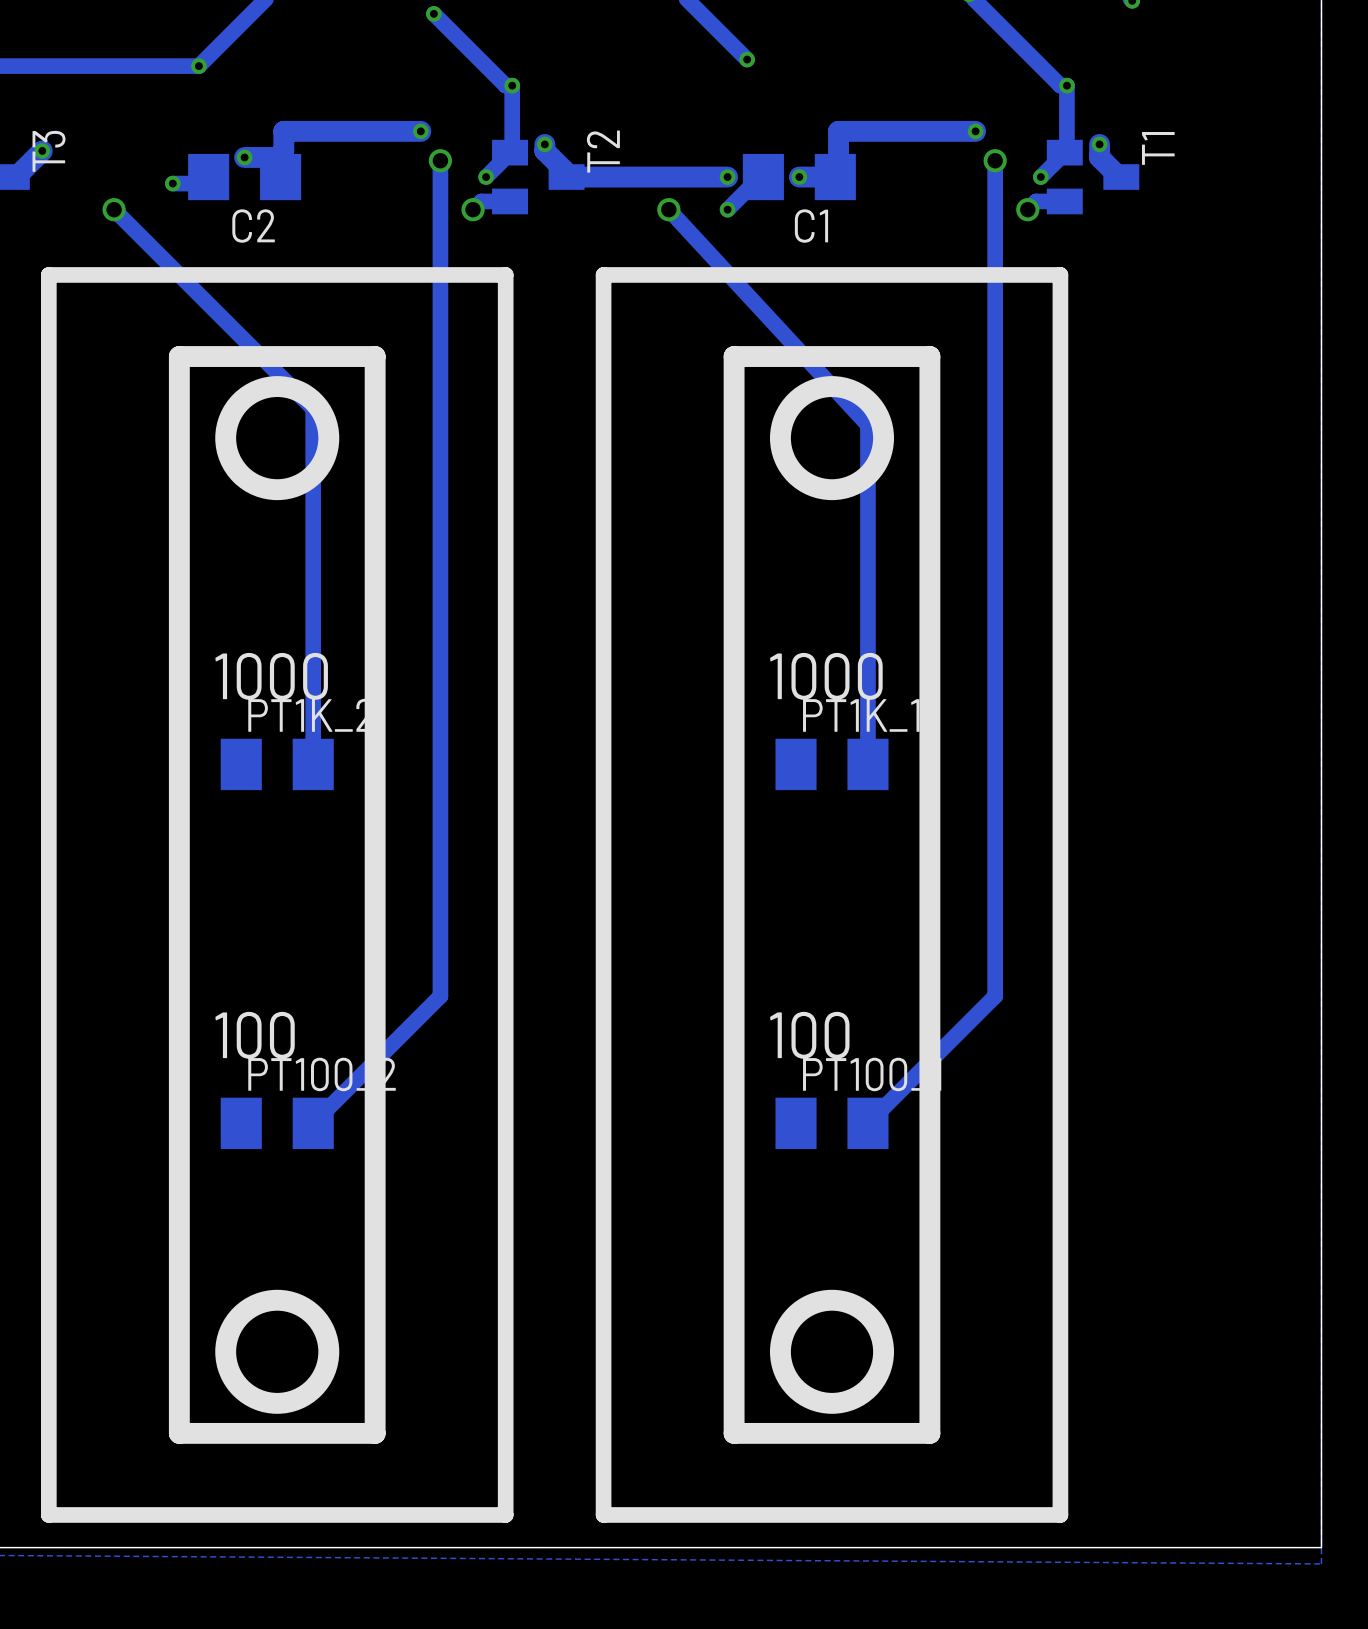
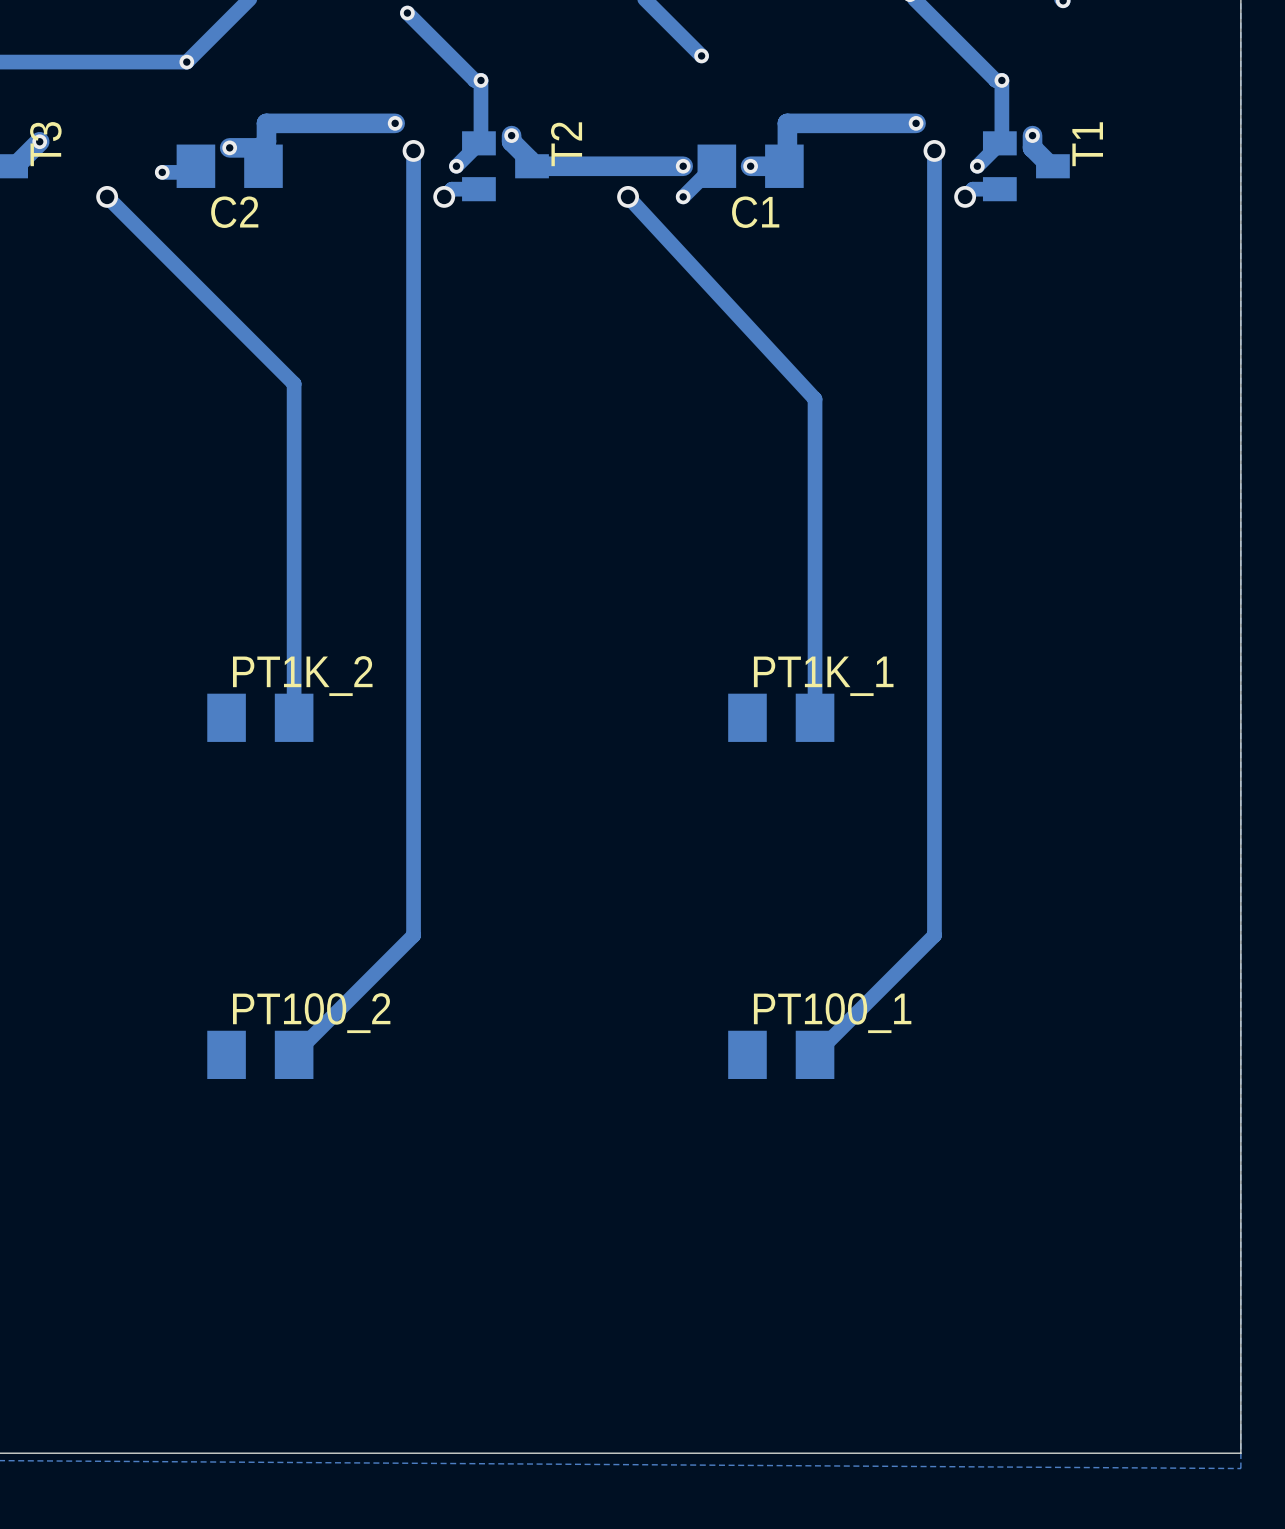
line: (505, 274) (48, 274) (48, 1514) (505, 1514) (505, 274) -> none
line: (1060, 274) (603, 274) (603, 1514) (1060, 1514) (1060, 274) -> none
line: (375, 356) (375, 1433) (179, 1433) (179, 356) (375, 356) -> none
line: (929, 356) (734, 356) (734, 1433) (929, 1433) (929, 356) -> none
drawing: [215, 376, 340, 501] -> none
drawing: [770, 376, 895, 501] -> none
text: 1000 (271, 676) -> none
text: 1000 (826, 676) -> none
text: 100 (255, 1035) -> none
text: 100 (809, 1035) -> none
drawing: [215, 1289, 340, 1414] -> none
drawing: [770, 1289, 895, 1414] -> none

